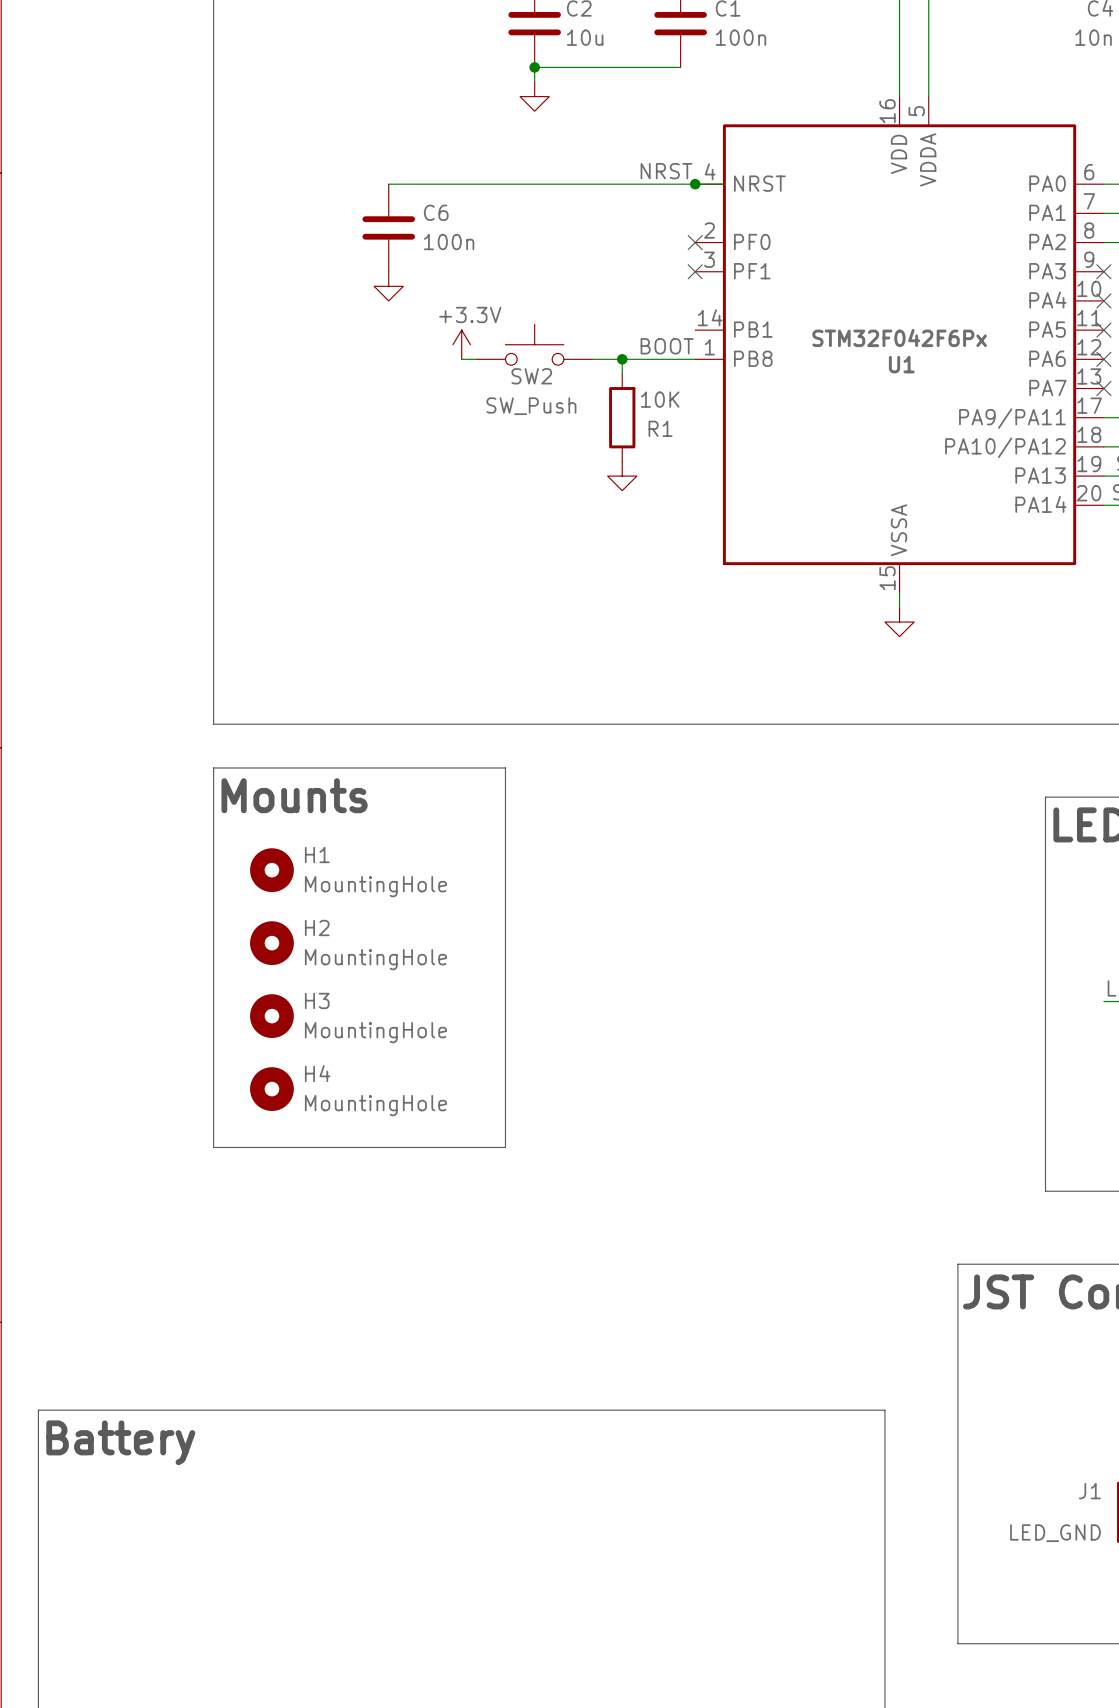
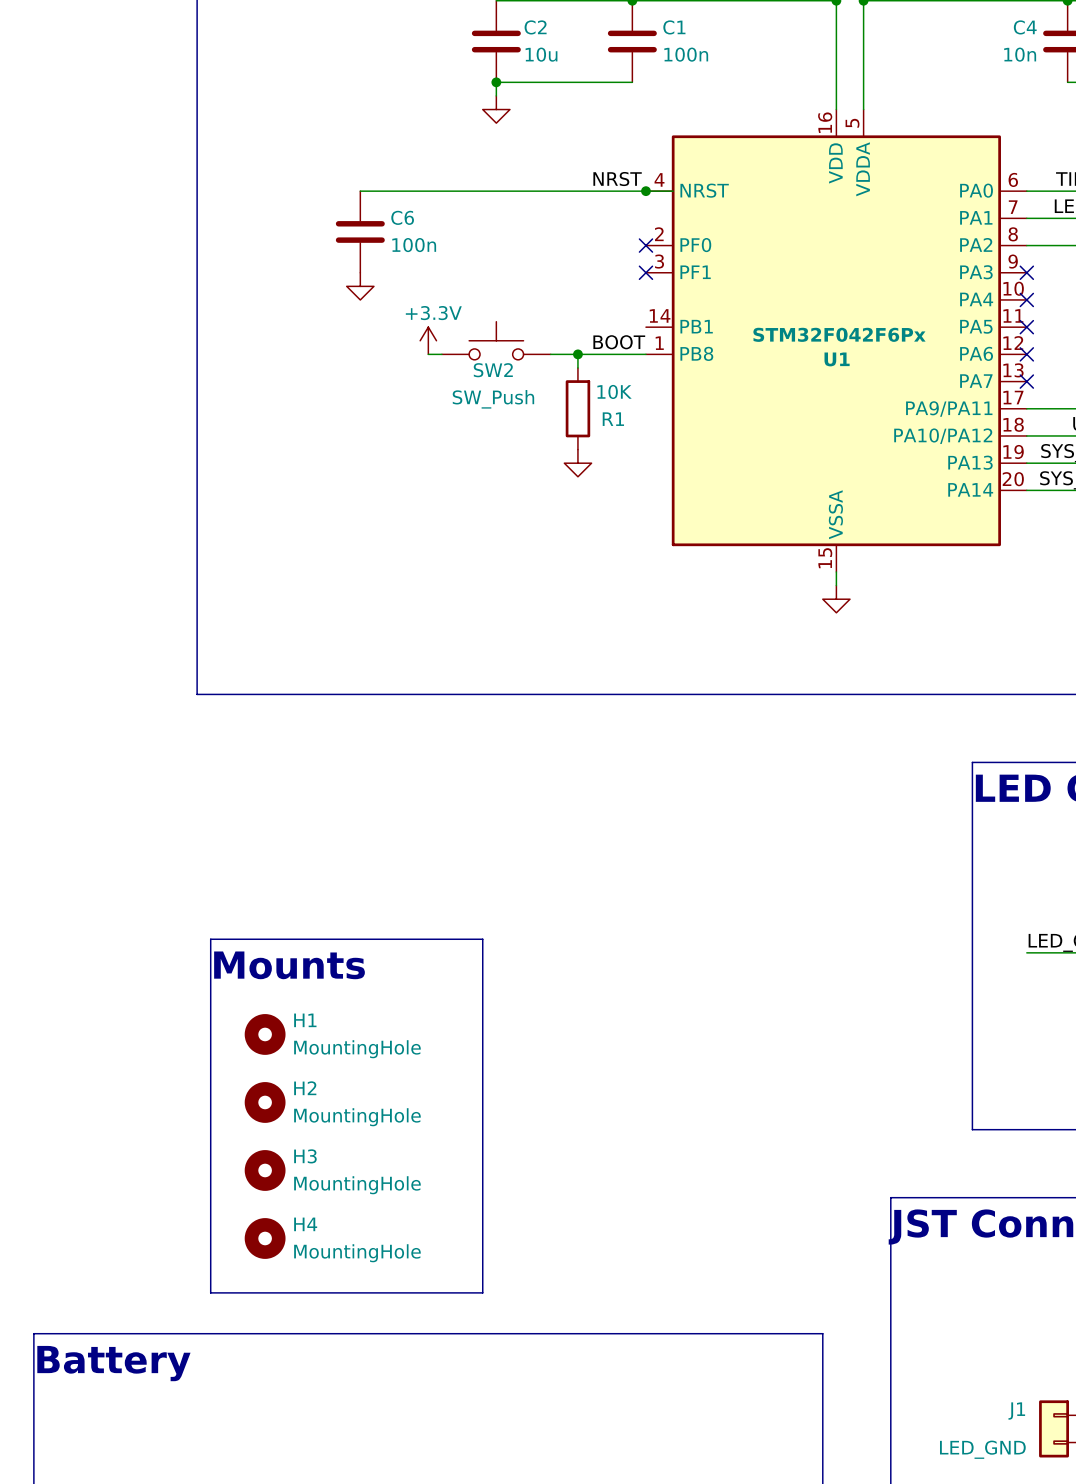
line: (213, 767) (505, 767) (505, 1147) (213, 1147) (213, 767) -> (210, 939) (482, 939) (482, 1292) (210, 1292) (210, 939)
text position: Mounts (294, 795) -> Mounts (289, 965)
H1 position: (271, 870) -> (265, 1034)
H2 position: (271, 943) -> (265, 1102)
H3 position: (271, 1016) -> (265, 1170)
H4 position: (271, 1089) -> (265, 1238)

